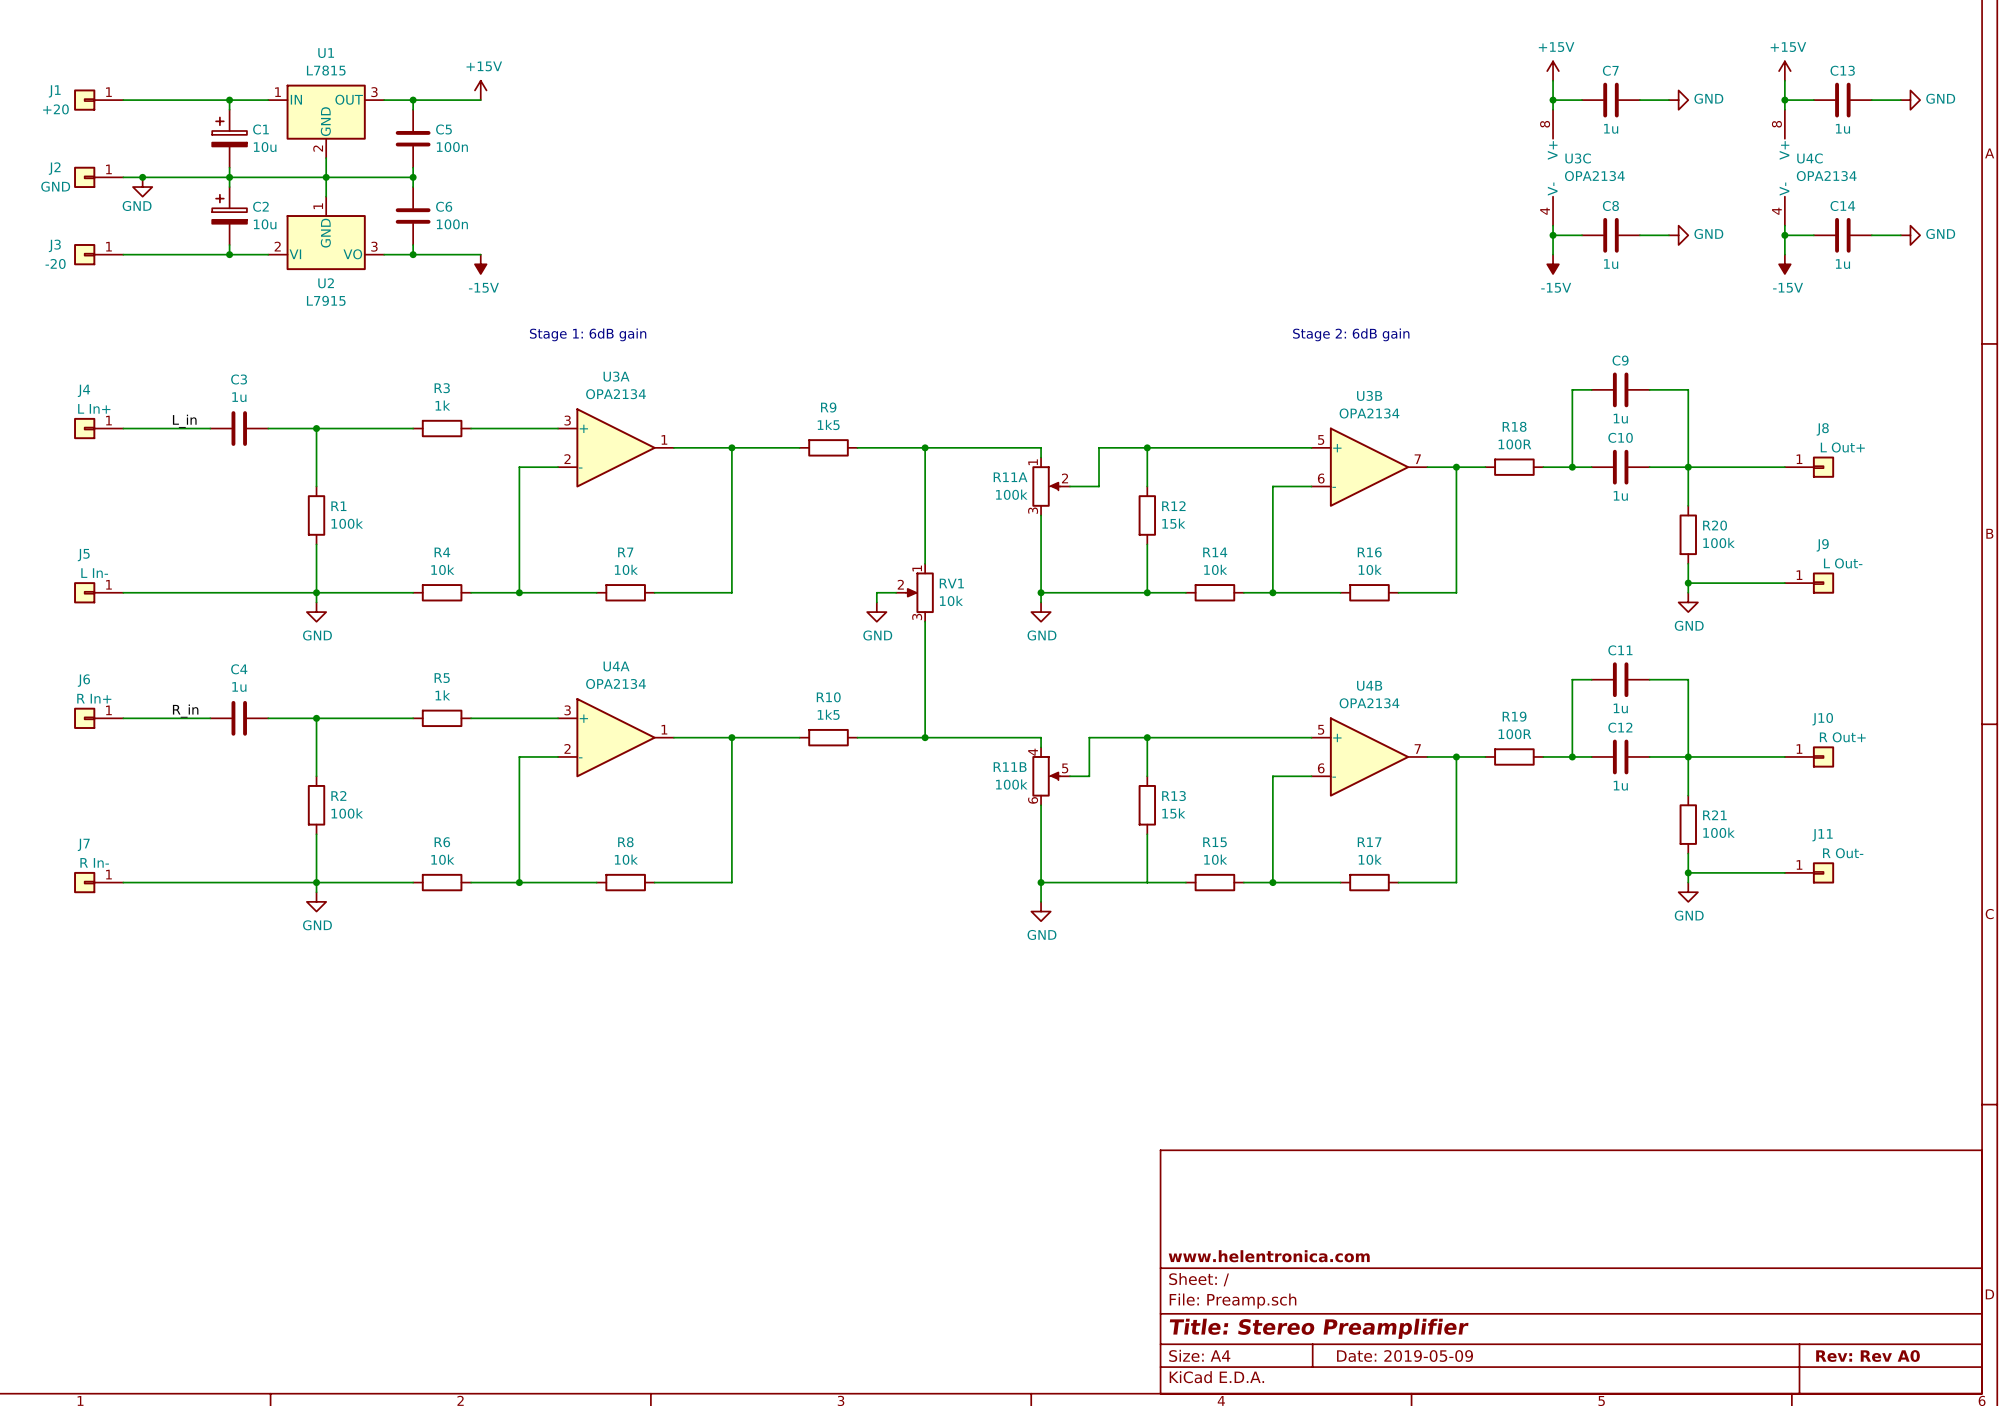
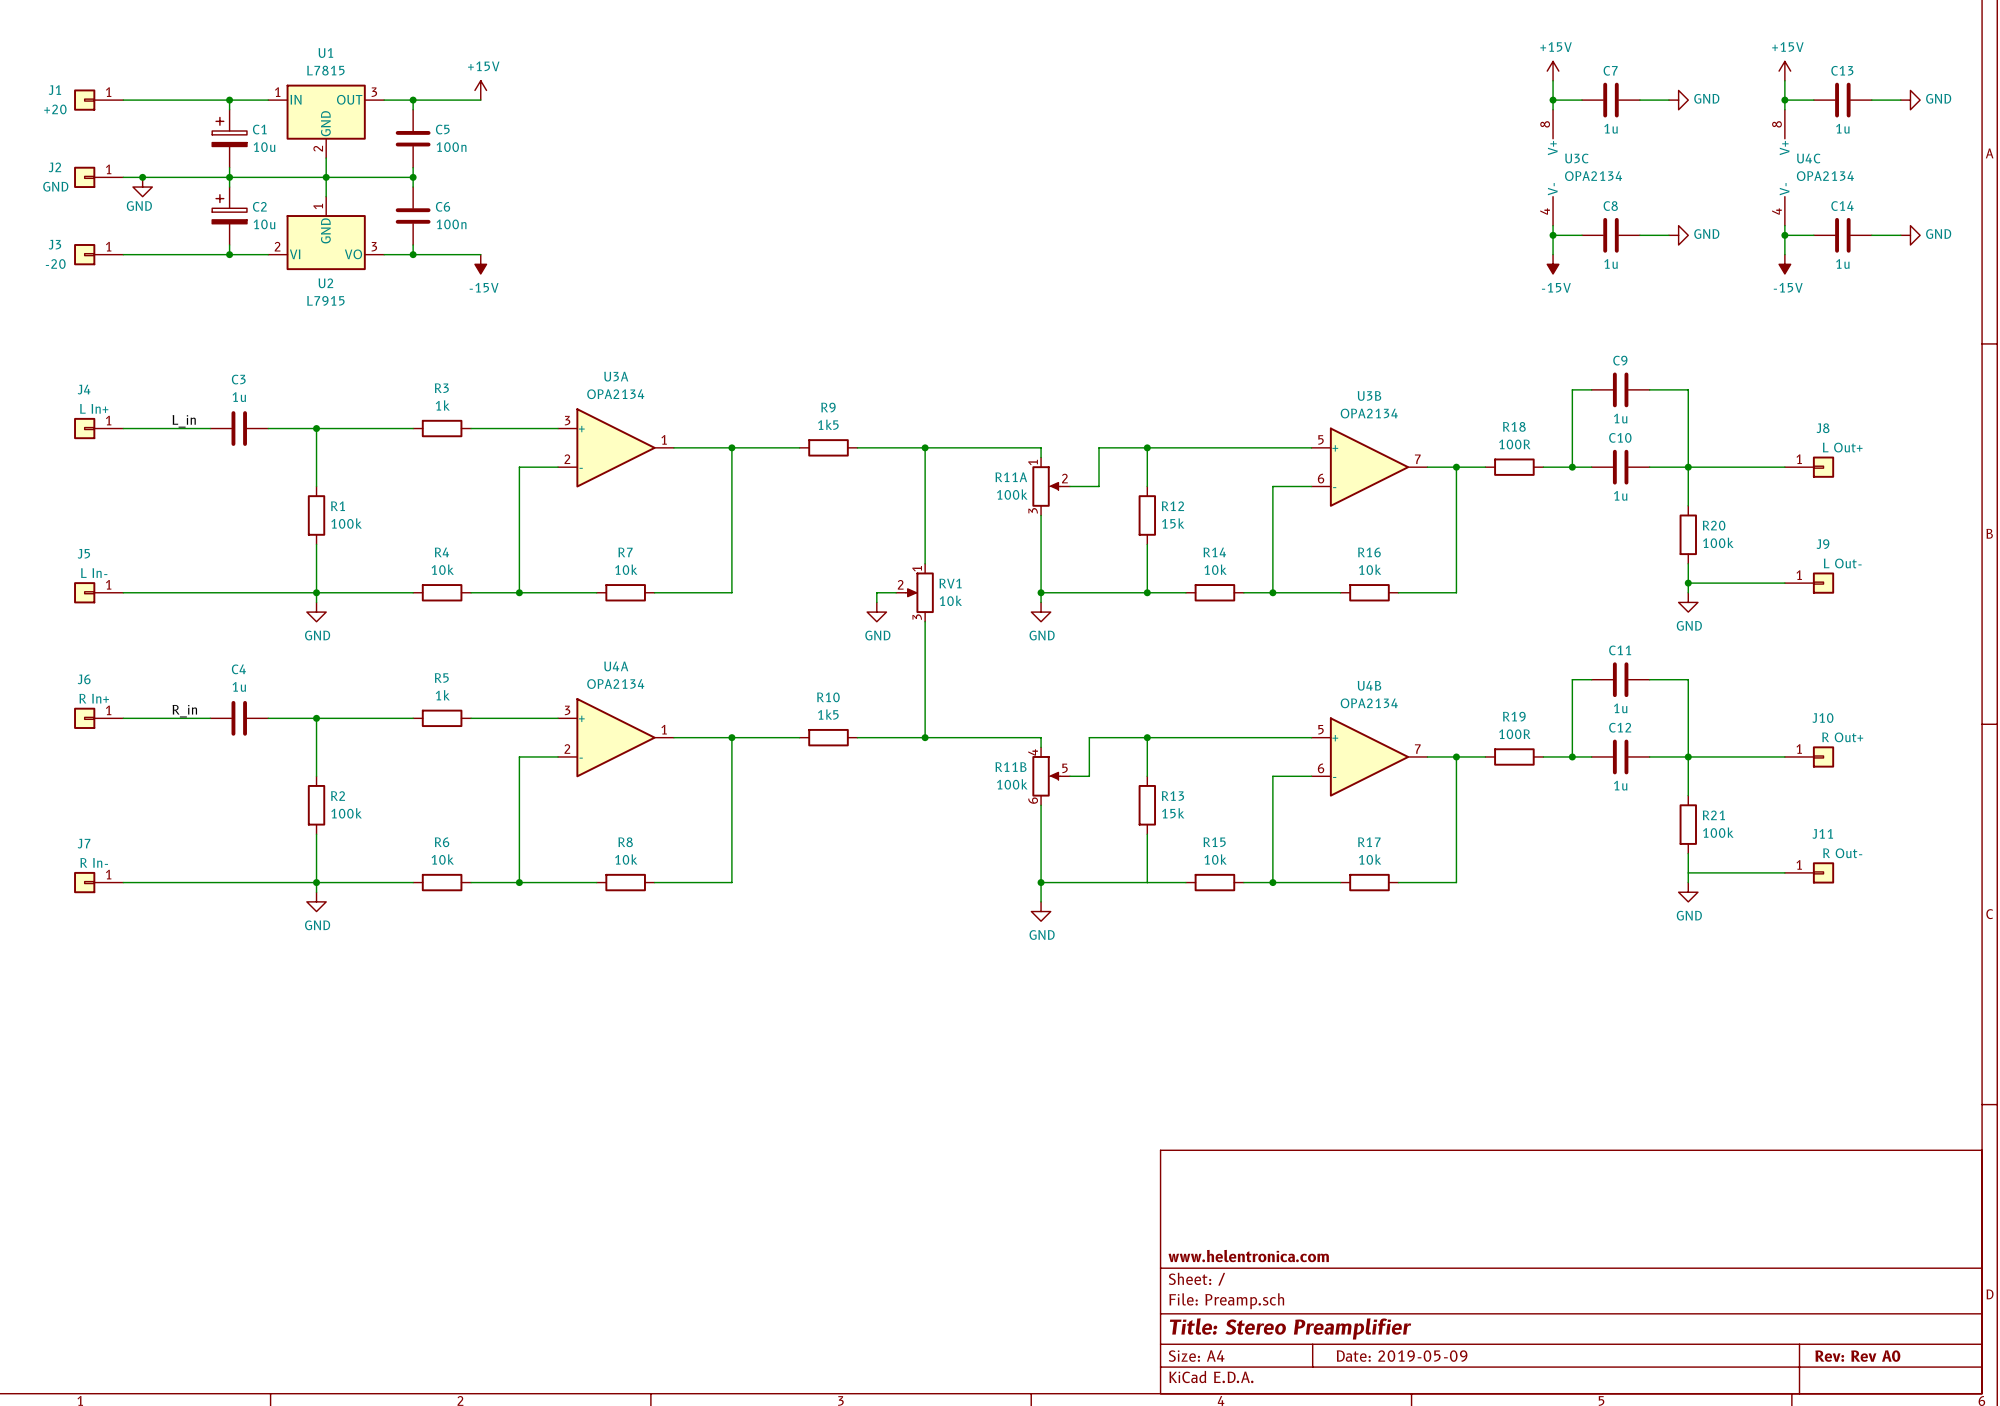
text: Stage 1: 6dB gain (588, 334) -> none
text: Stage 2: 6dB gain (1351, 334) -> none
junction: (1688, 872) -> none

